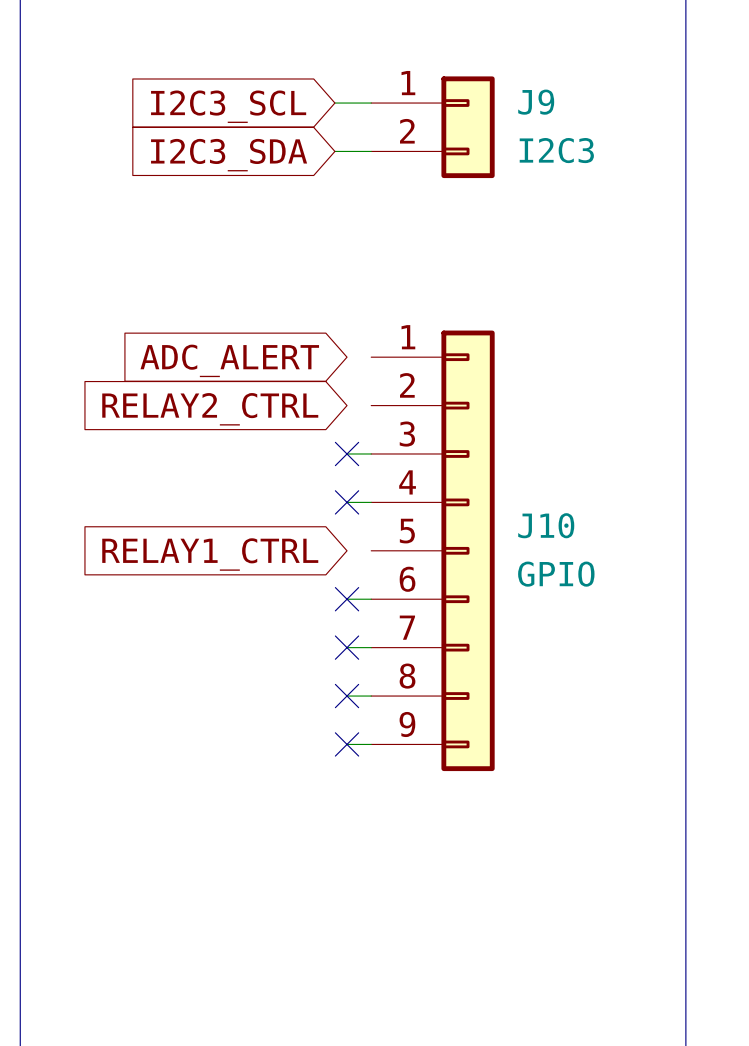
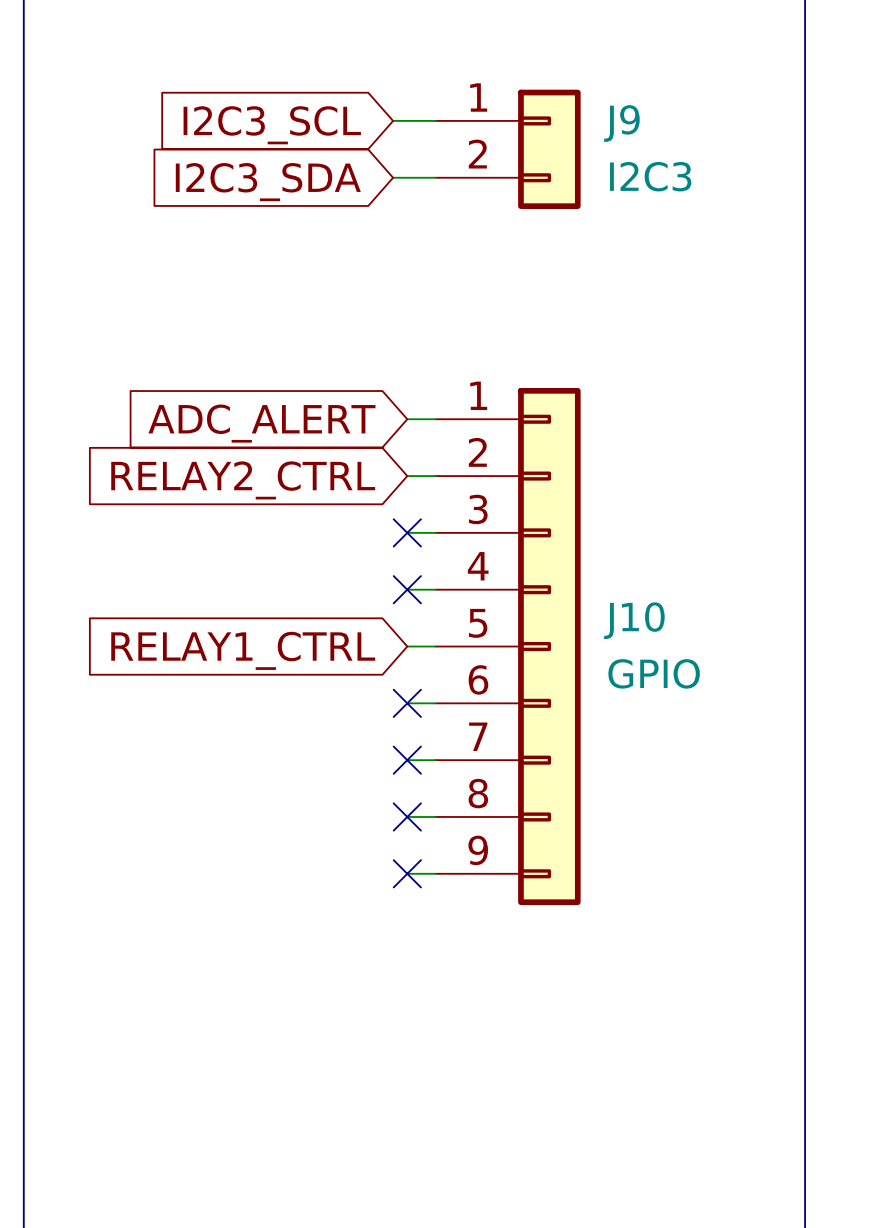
wire: none -> (407, 419) (435, 419)
wire: none -> (407, 476) (435, 476)
wire: none -> (407, 646) (435, 646)

